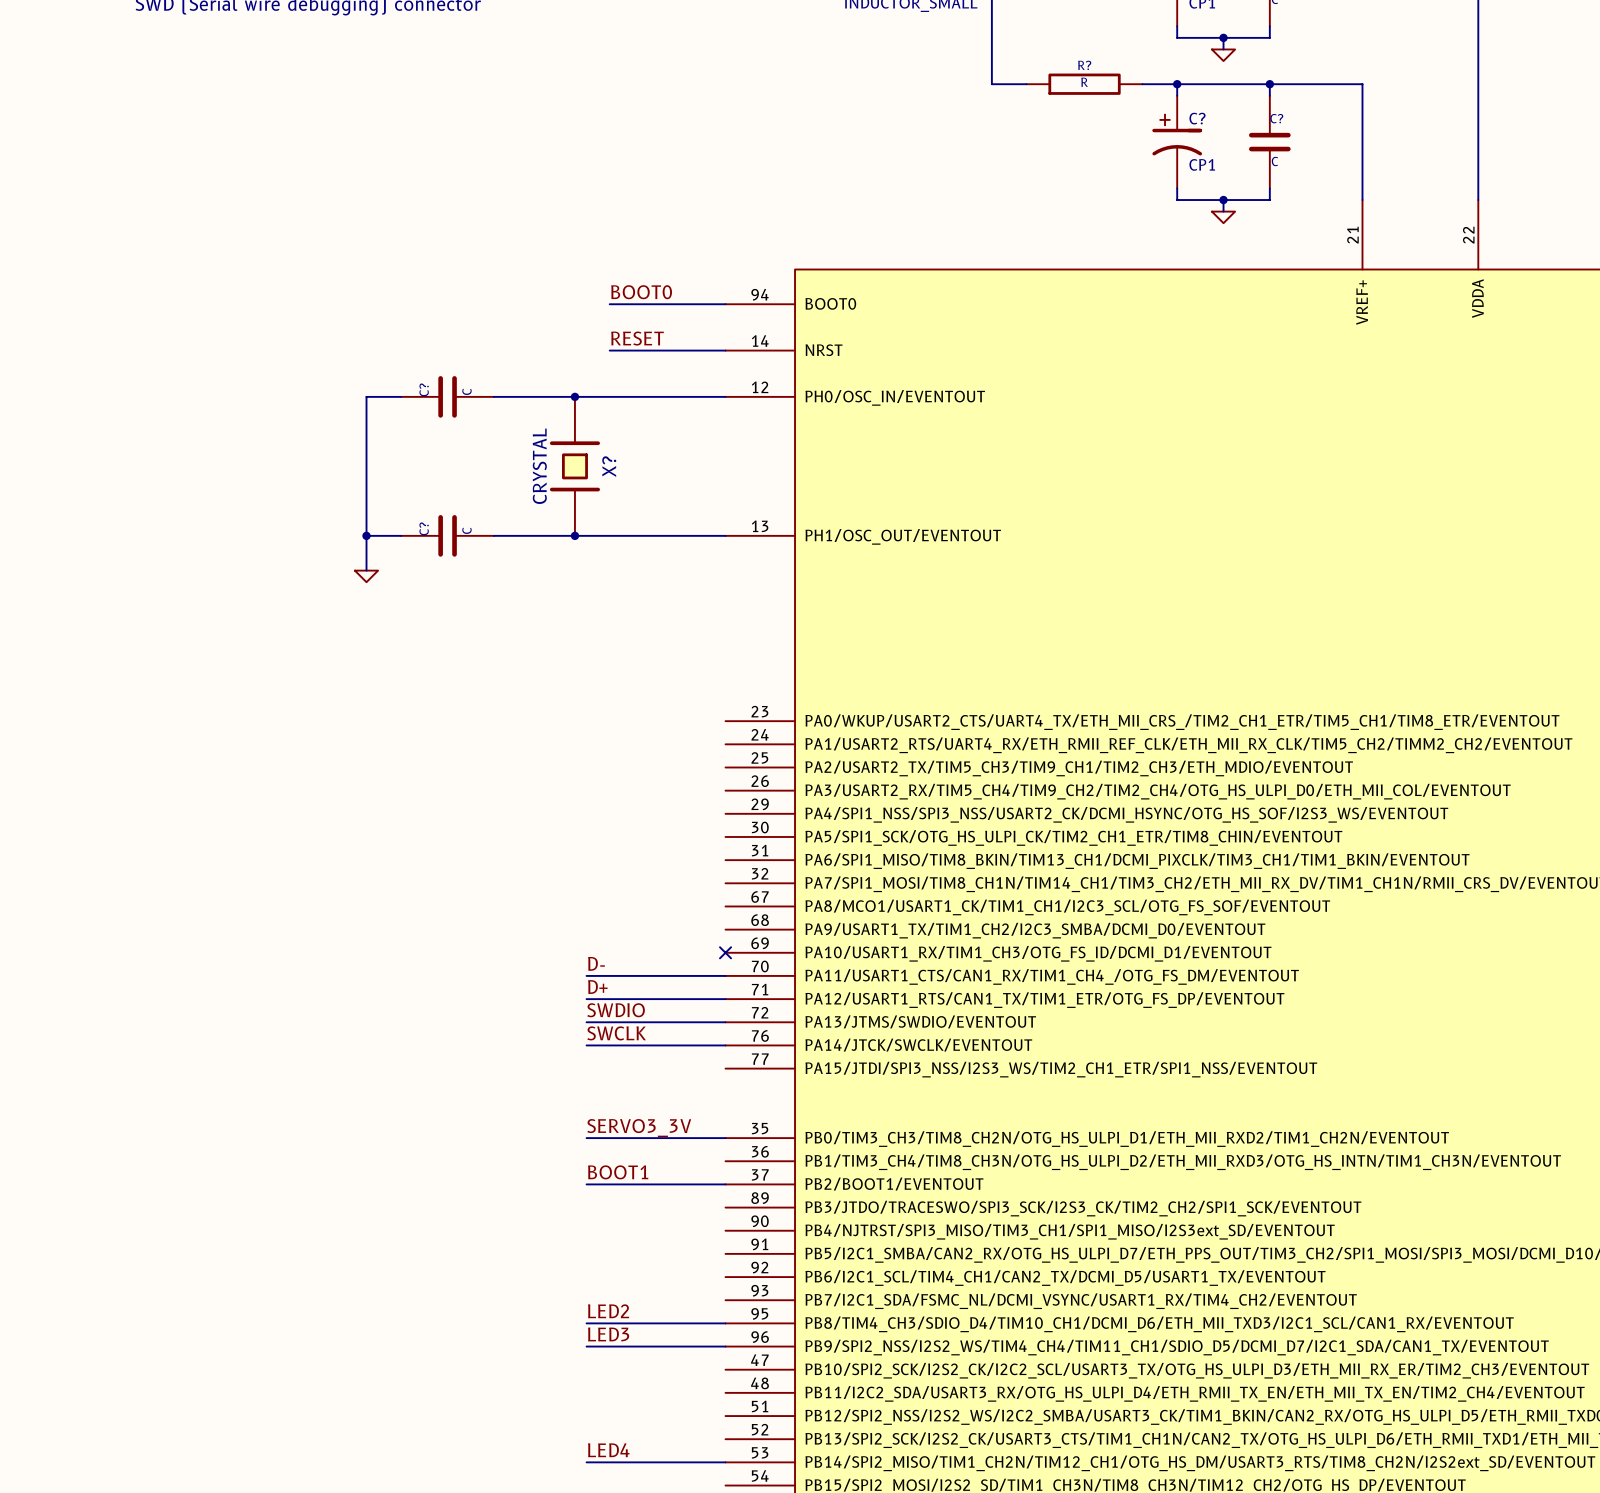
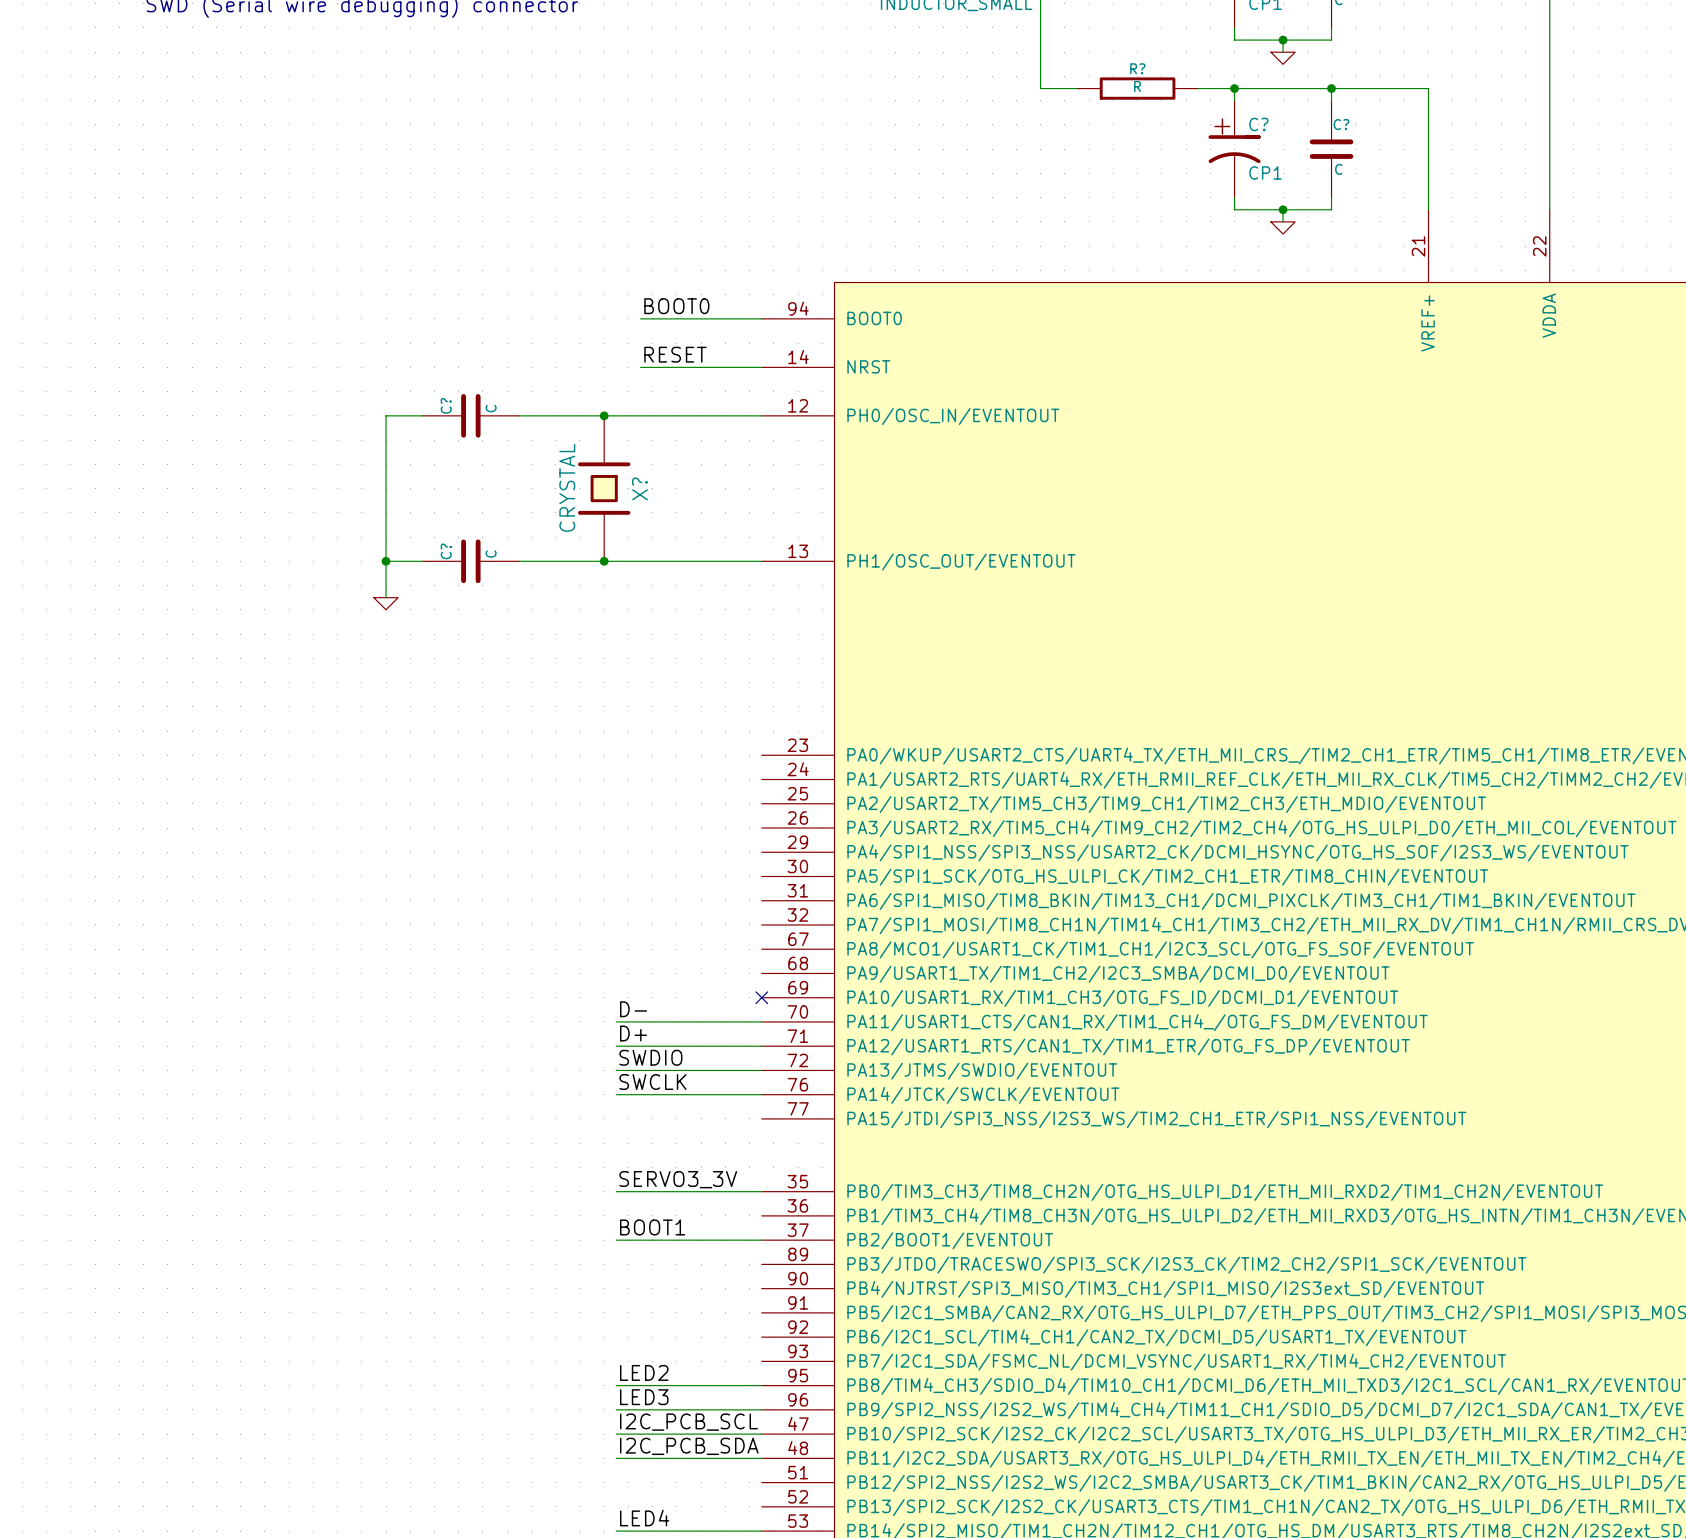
label: none -> I2C_PCB_SCL (688, 1422)
wire: none -> (616, 1434) (761, 1434)
label: none -> I2C_PCB_SDA (689, 1446)
wire: none -> (616, 1458) (761, 1458)

